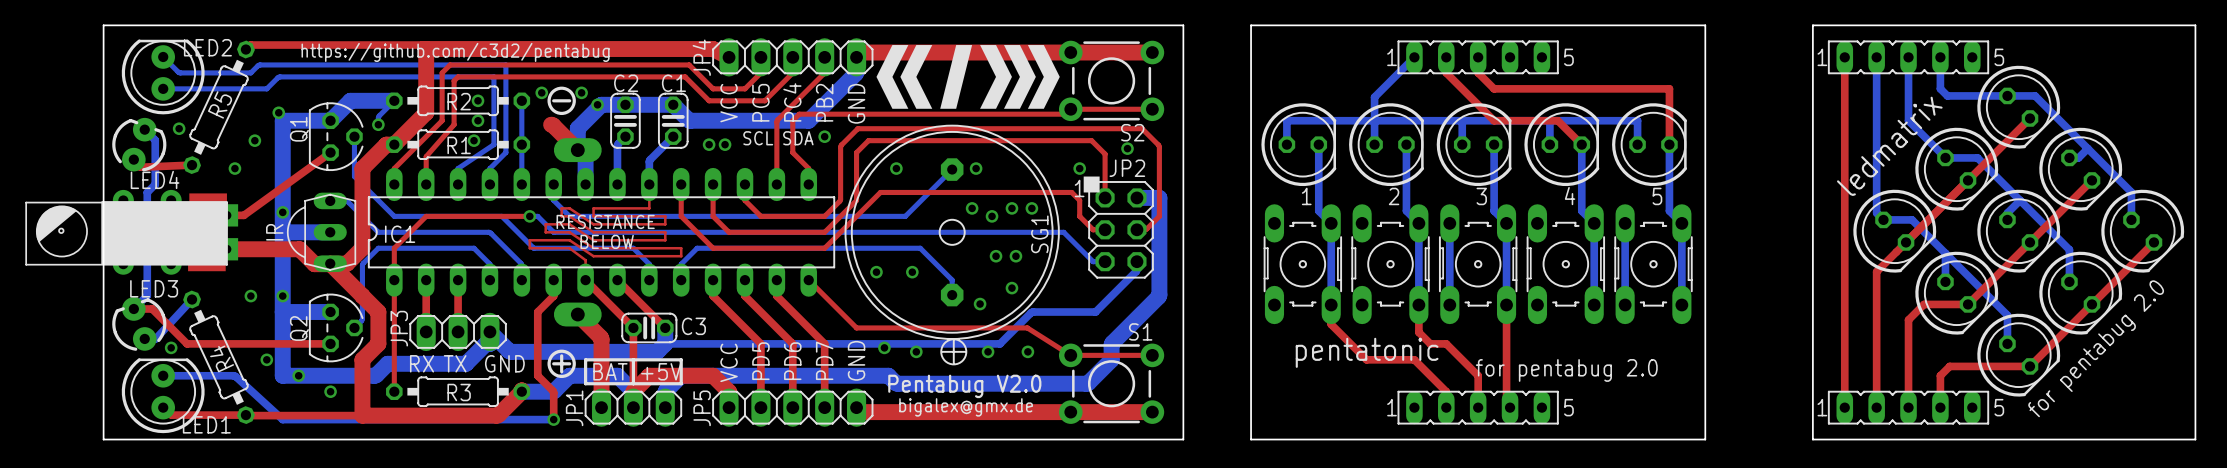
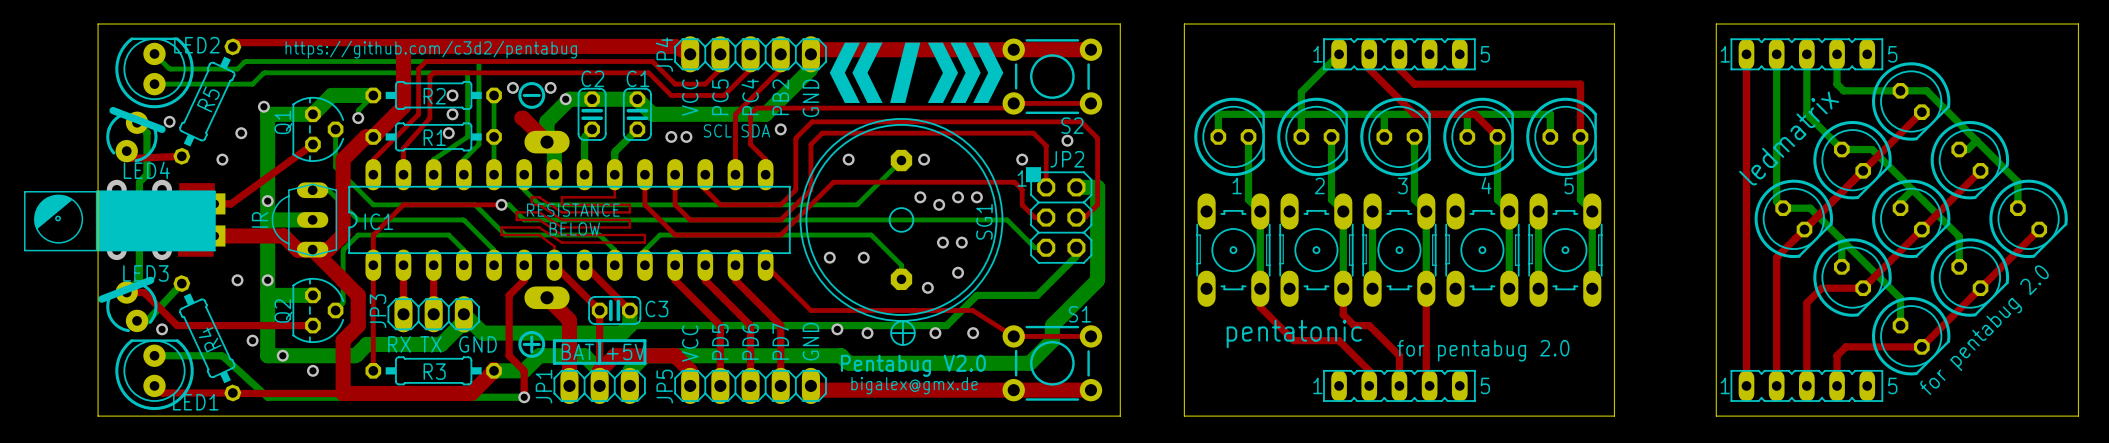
line: none -> (113, 110) (162, 129)
line: none -> (150, 280) (101, 299)

